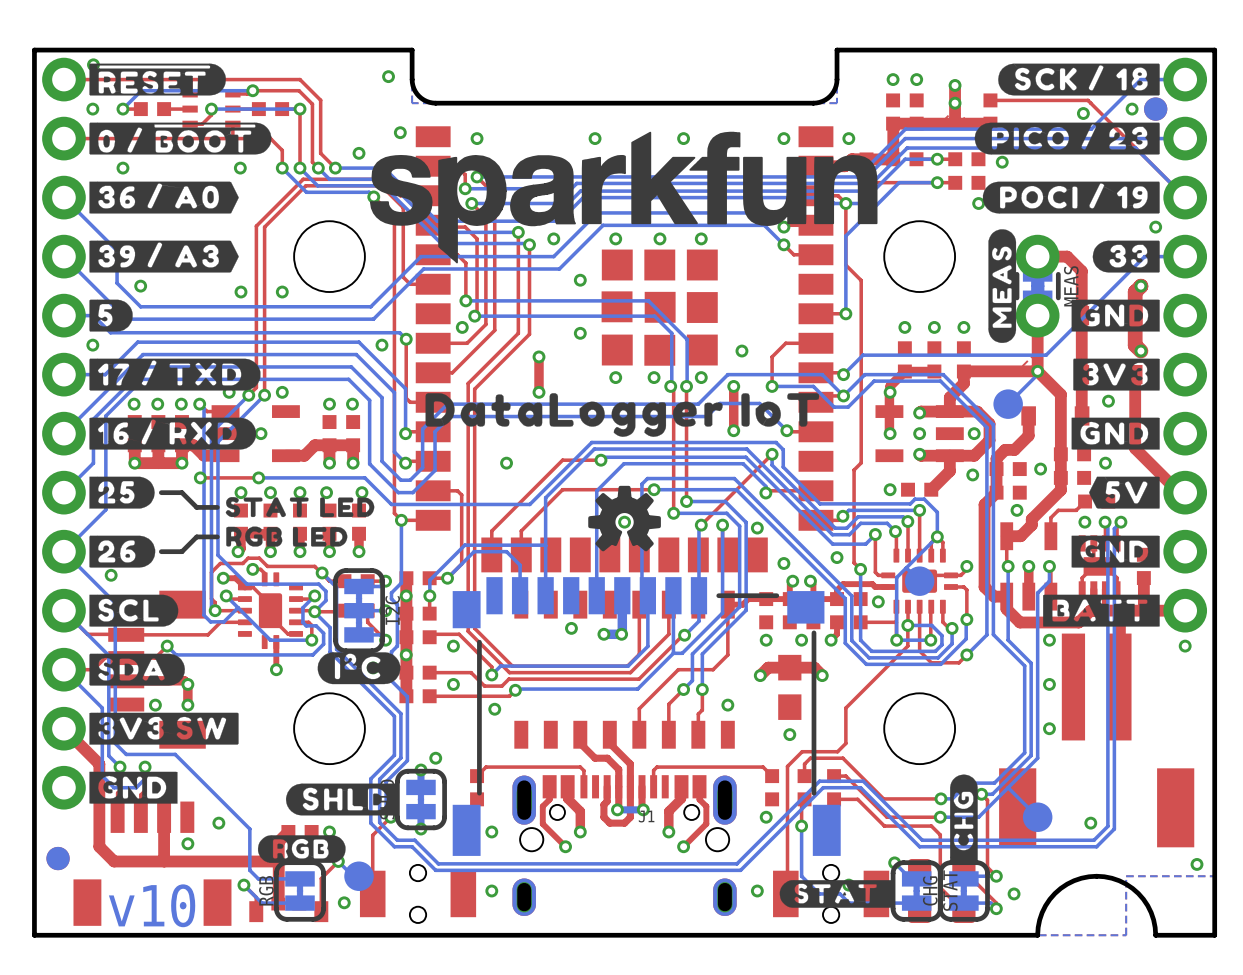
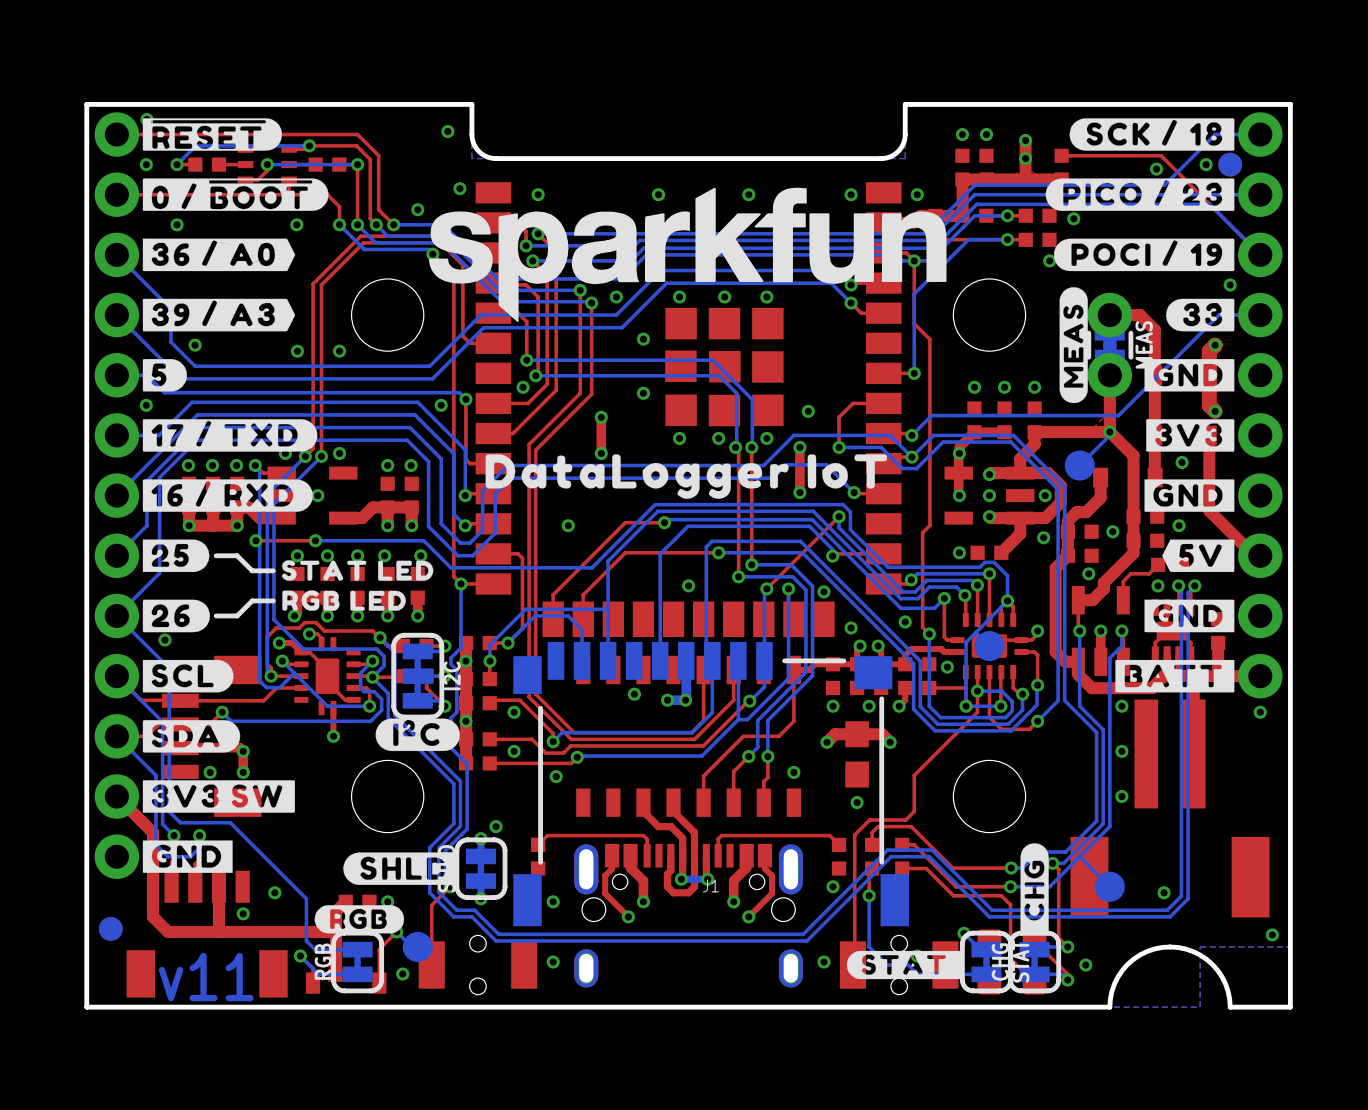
drawing: [588, 485, 661, 552] -> none
text: v10 (152, 905) -> v11 (206, 977)

